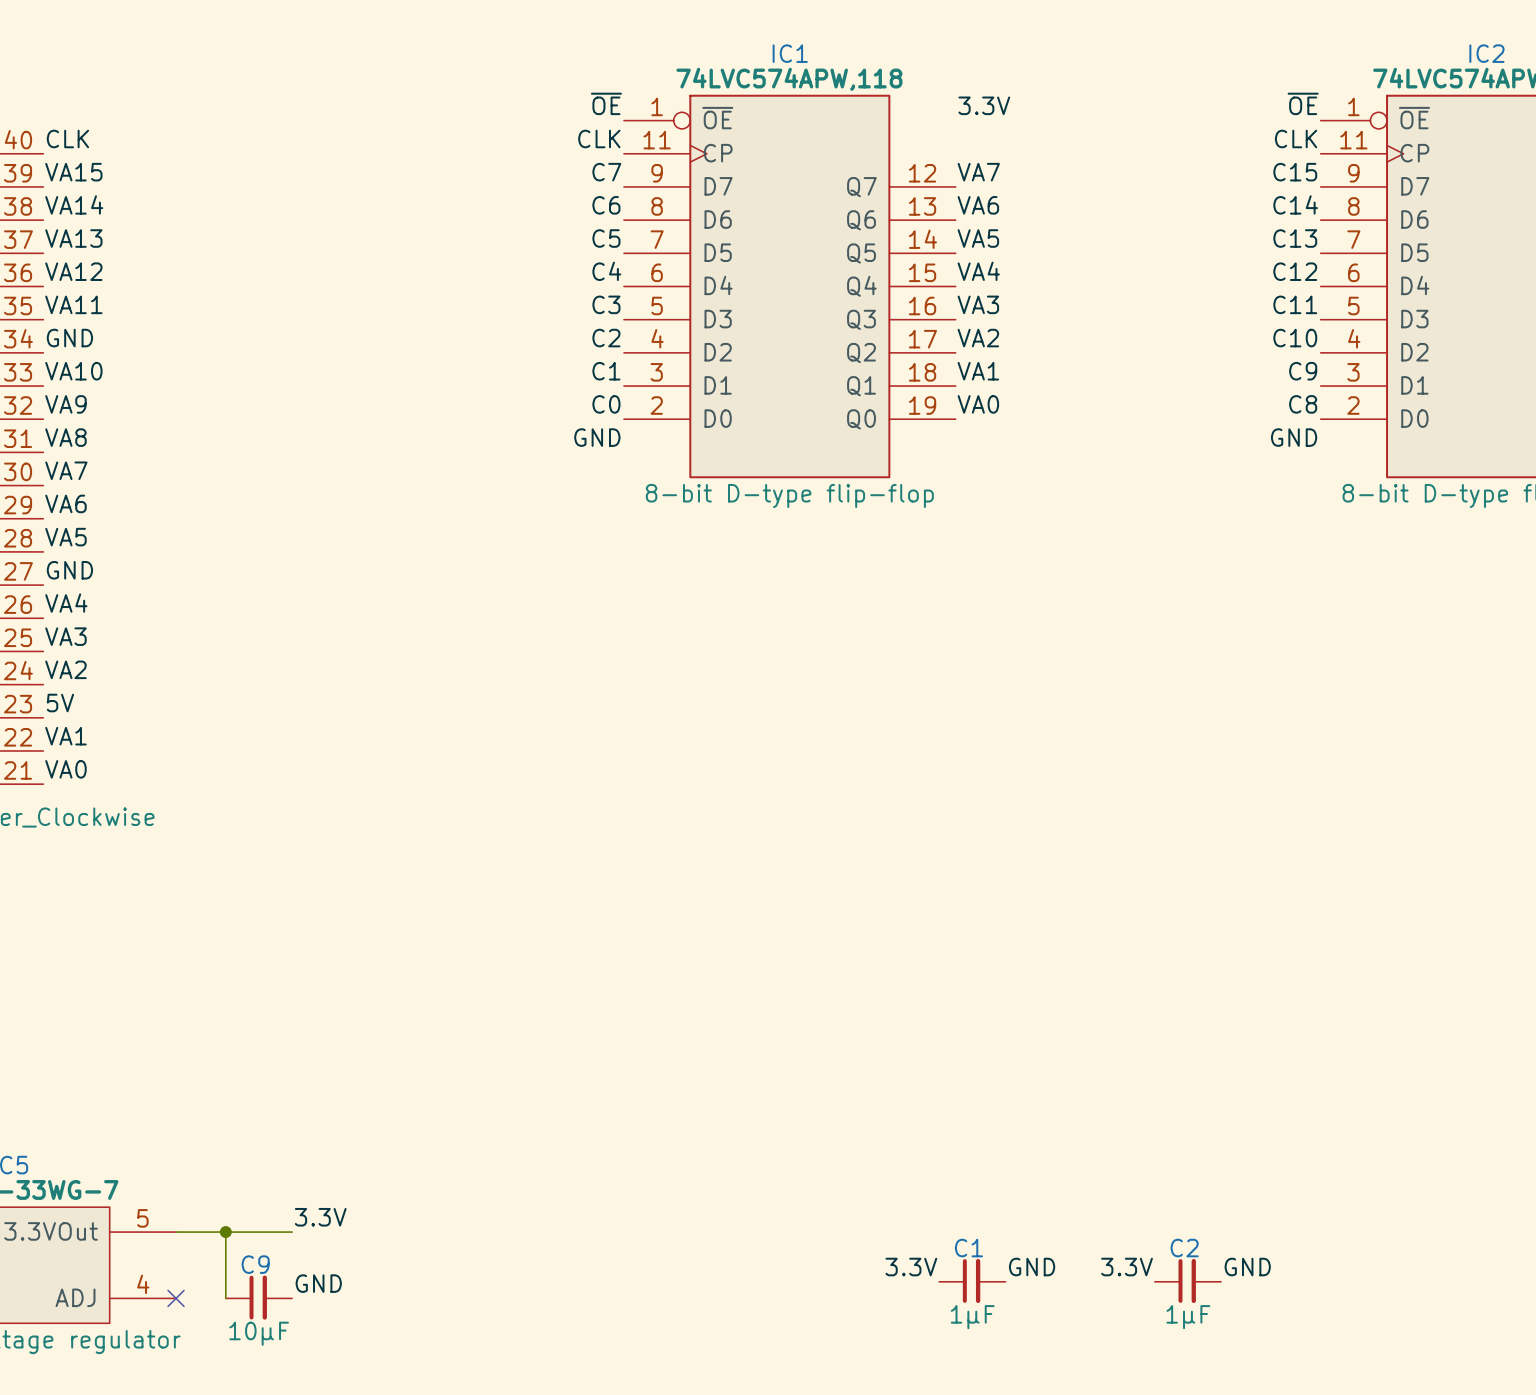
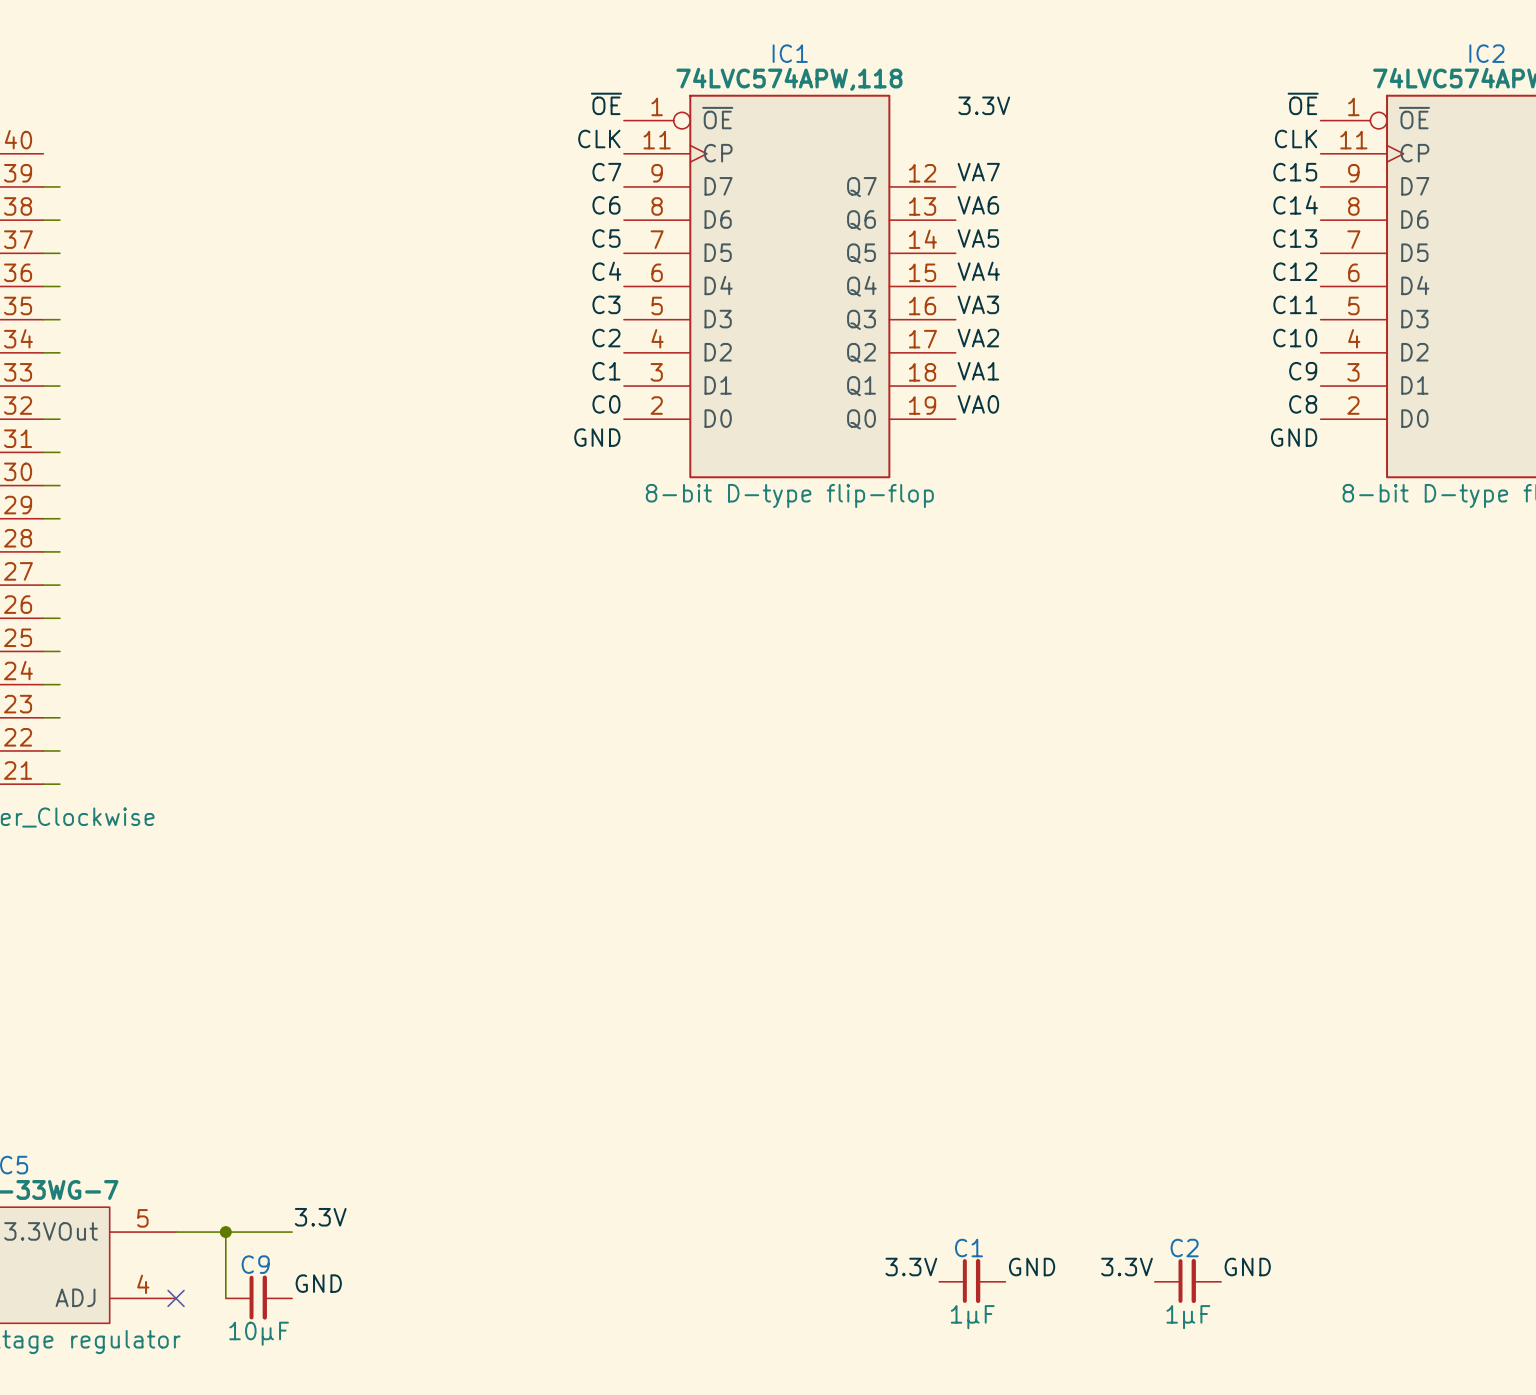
label: CLK (67, 138) -> none
label: VA15 (73, 172) -> none
wire: none -> (43, 186) (59, 186)
label: VA14 (74, 204) -> none
wire: none -> (43, 220) (59, 220)
label: VA13 (73, 238) -> none
wire: none -> (43, 253) (59, 253)
label: VA12 (73, 271) -> none
wire: none -> (43, 286) (59, 286)
label: VA11 (73, 304) -> none
wire: none -> (43, 319) (59, 319)
label: GND (69, 338) -> none
wire: none -> (43, 352) (59, 352)
label: VA10 (73, 371) -> none
wire: none -> (43, 386) (59, 386)
label: VA9 (65, 404) -> none
wire: none -> (43, 419) (59, 419)
label: VA8 (65, 437) -> none
wire: none -> (43, 452) (59, 452)
label: VA7 (66, 470) -> none
wire: none -> (43, 485) (59, 485)
label: VA6 (65, 503) -> none
wire: none -> (43, 518) (59, 518)
label: VA5 (65, 537) -> none
wire: none -> (43, 551) (59, 551)
label: GND (69, 570) -> none
wire: none -> (43, 585) (59, 585)
label: VA4 (66, 603) -> none
wire: none -> (43, 618) (59, 618)
label: VA3 (65, 636) -> none
wire: none -> (43, 651) (59, 651)
label: VA2 (65, 669) -> none
wire: none -> (43, 684) (59, 684)
label: 5V (60, 703) -> none
wire: none -> (43, 717) (59, 717)
label: VA1 (65, 736) -> none
wire: none -> (43, 750) (59, 750)
label: VA0 (65, 769) -> none
wire: none -> (43, 784) (59, 784)

